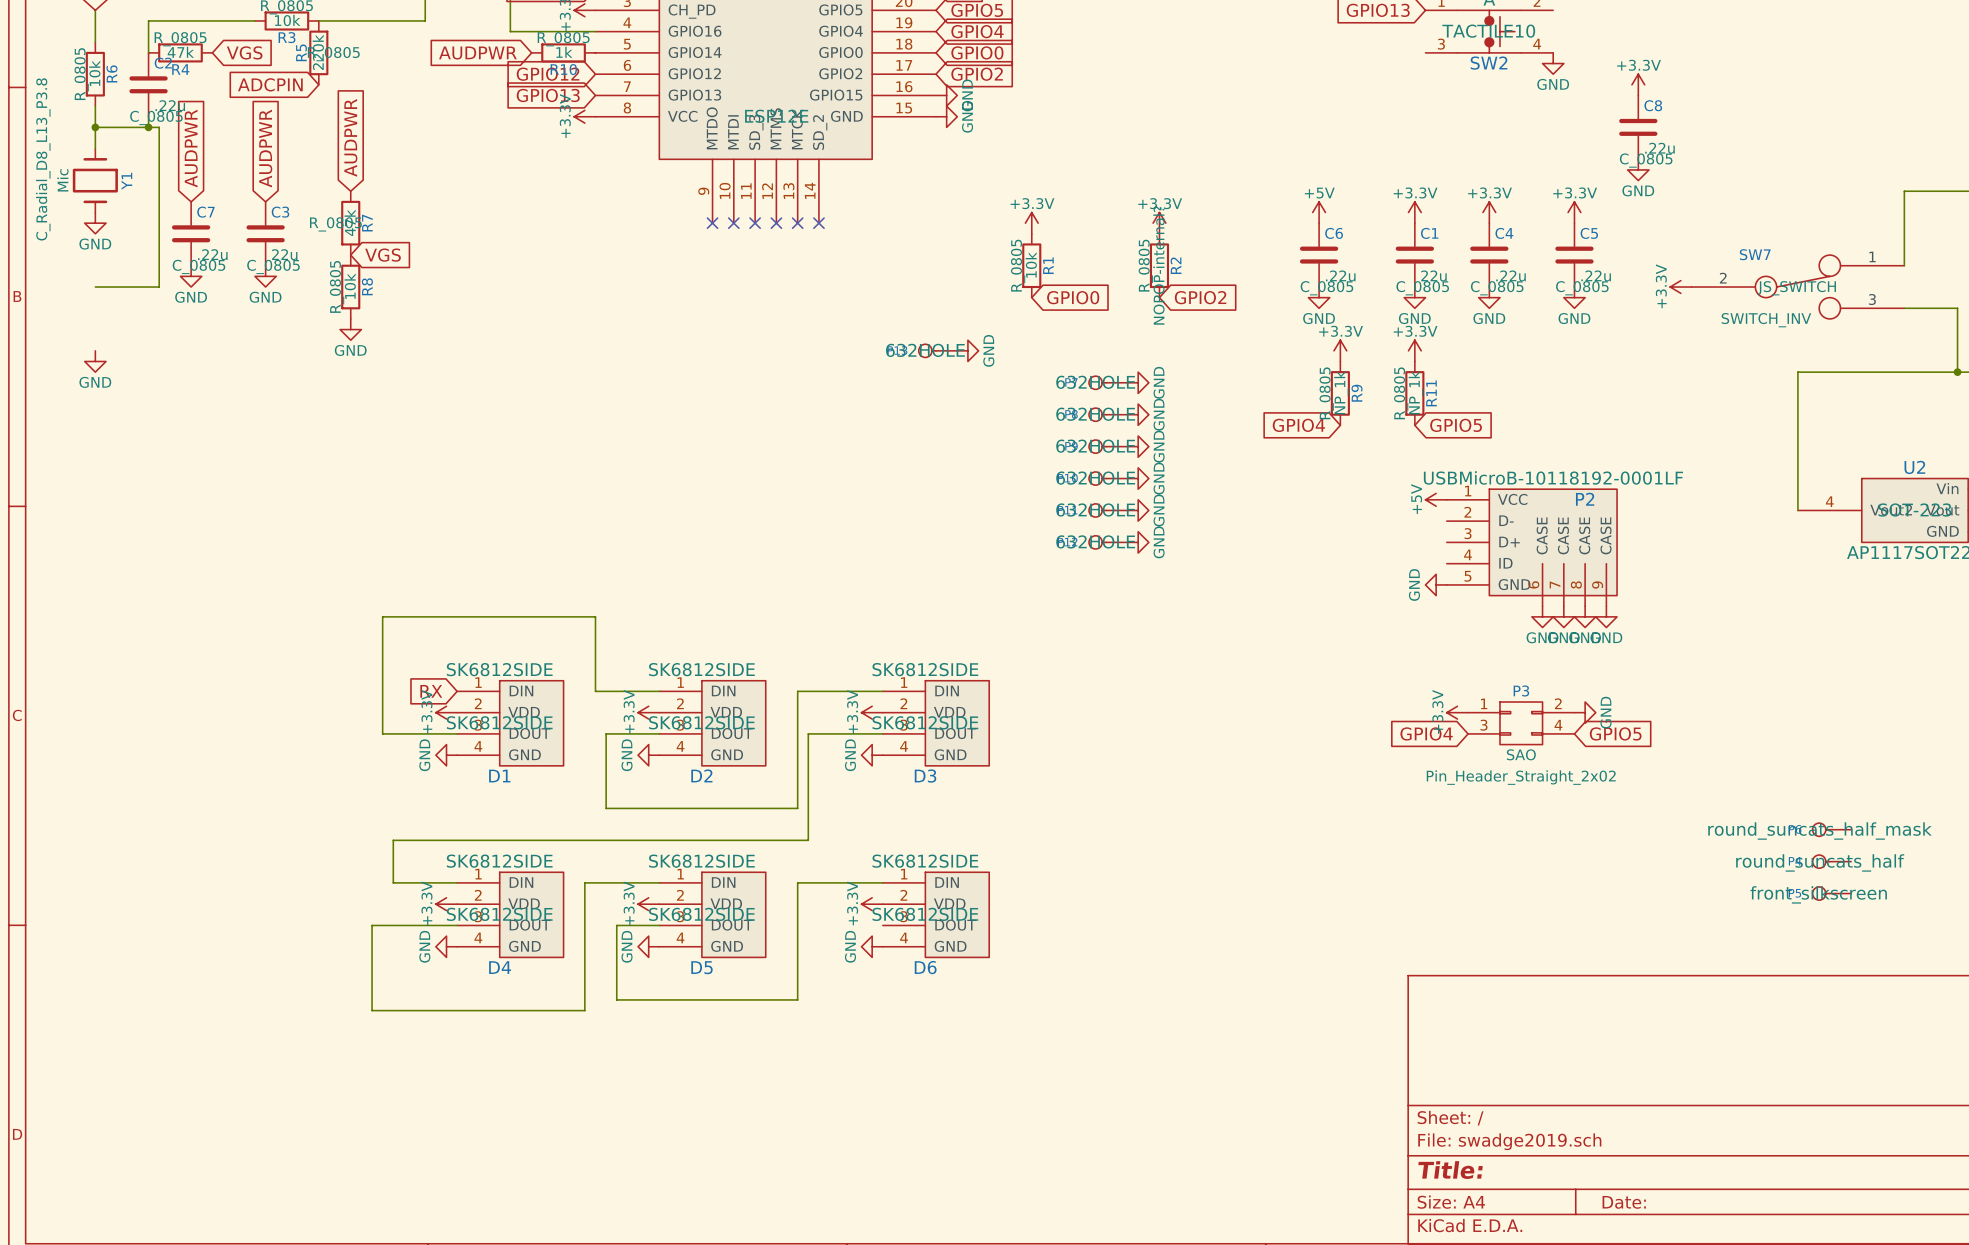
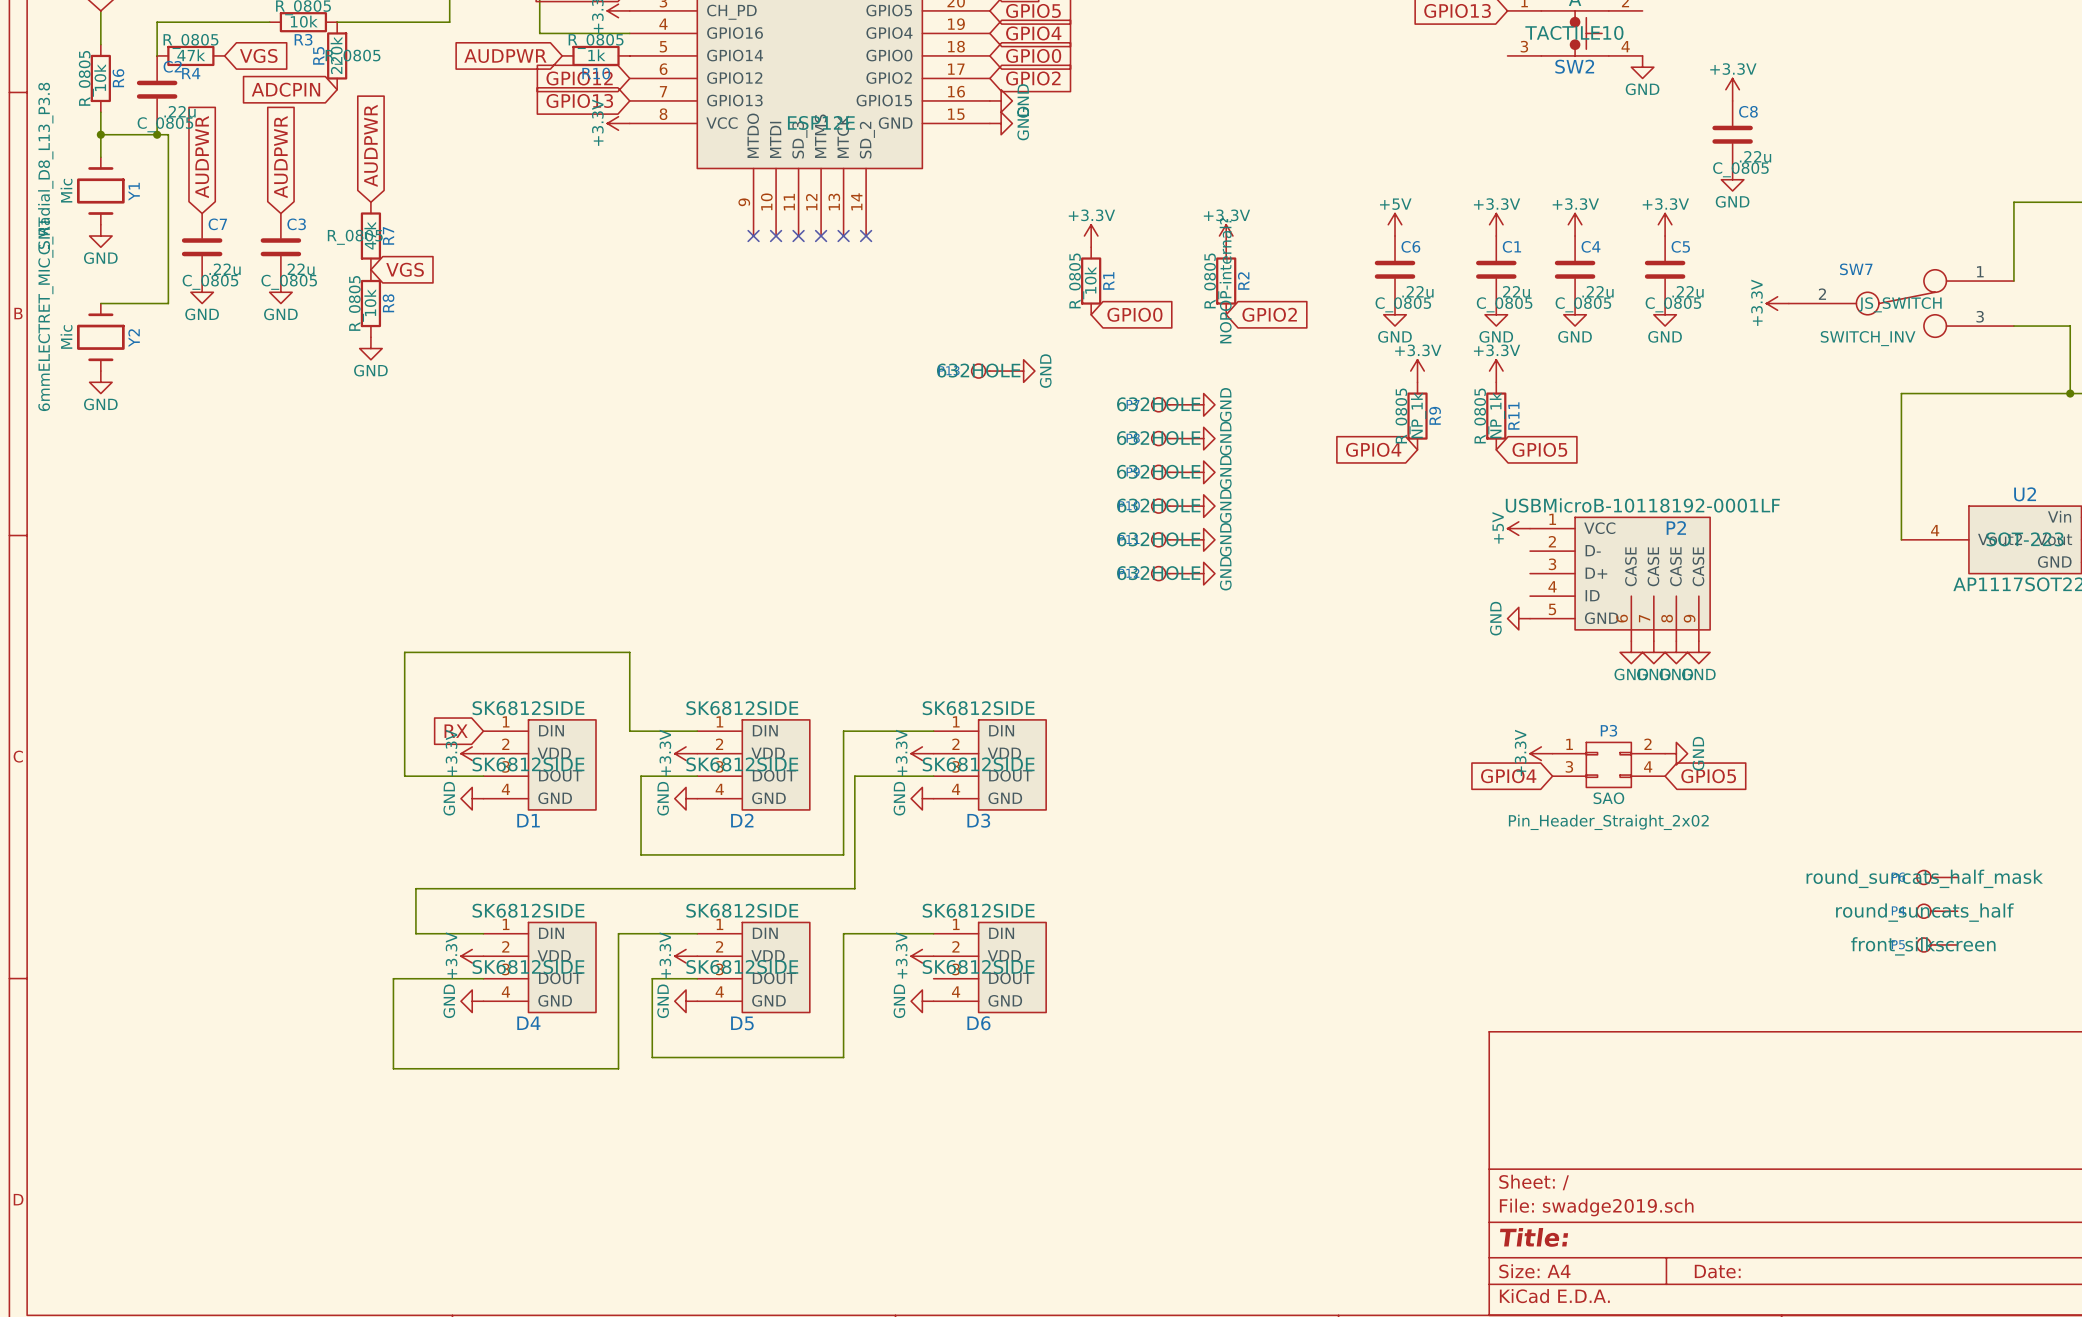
Y2: none -> Mic (100, 337)

